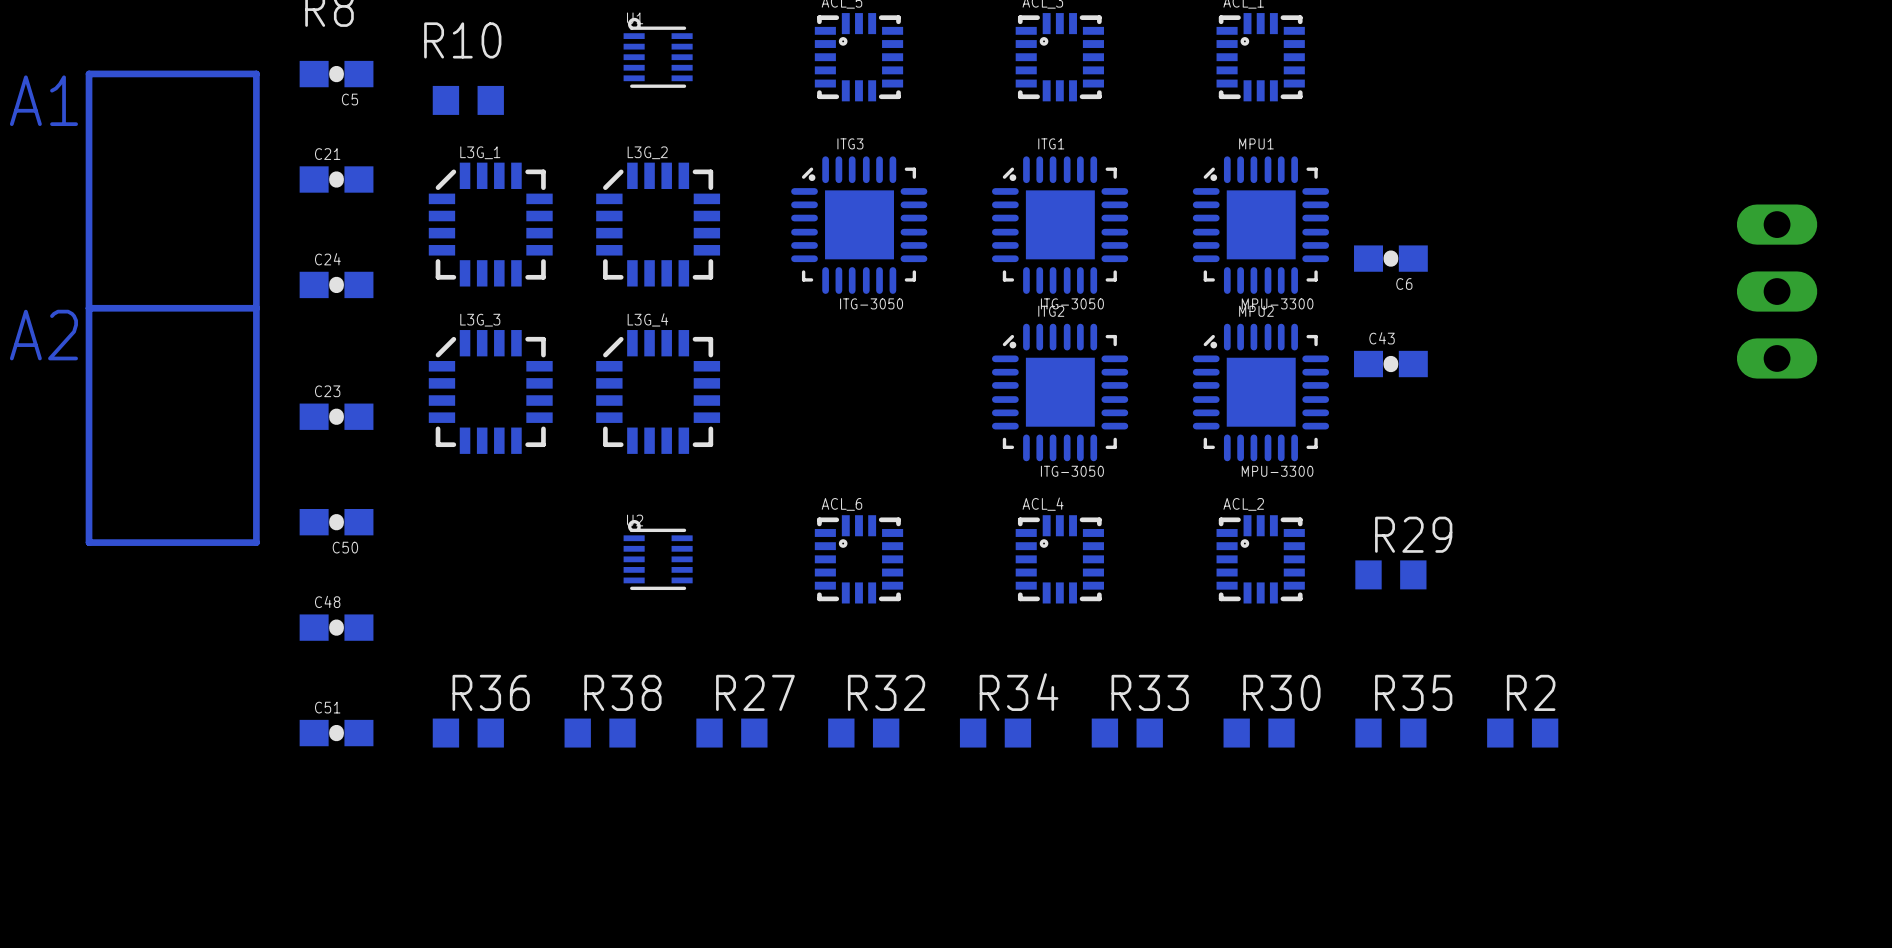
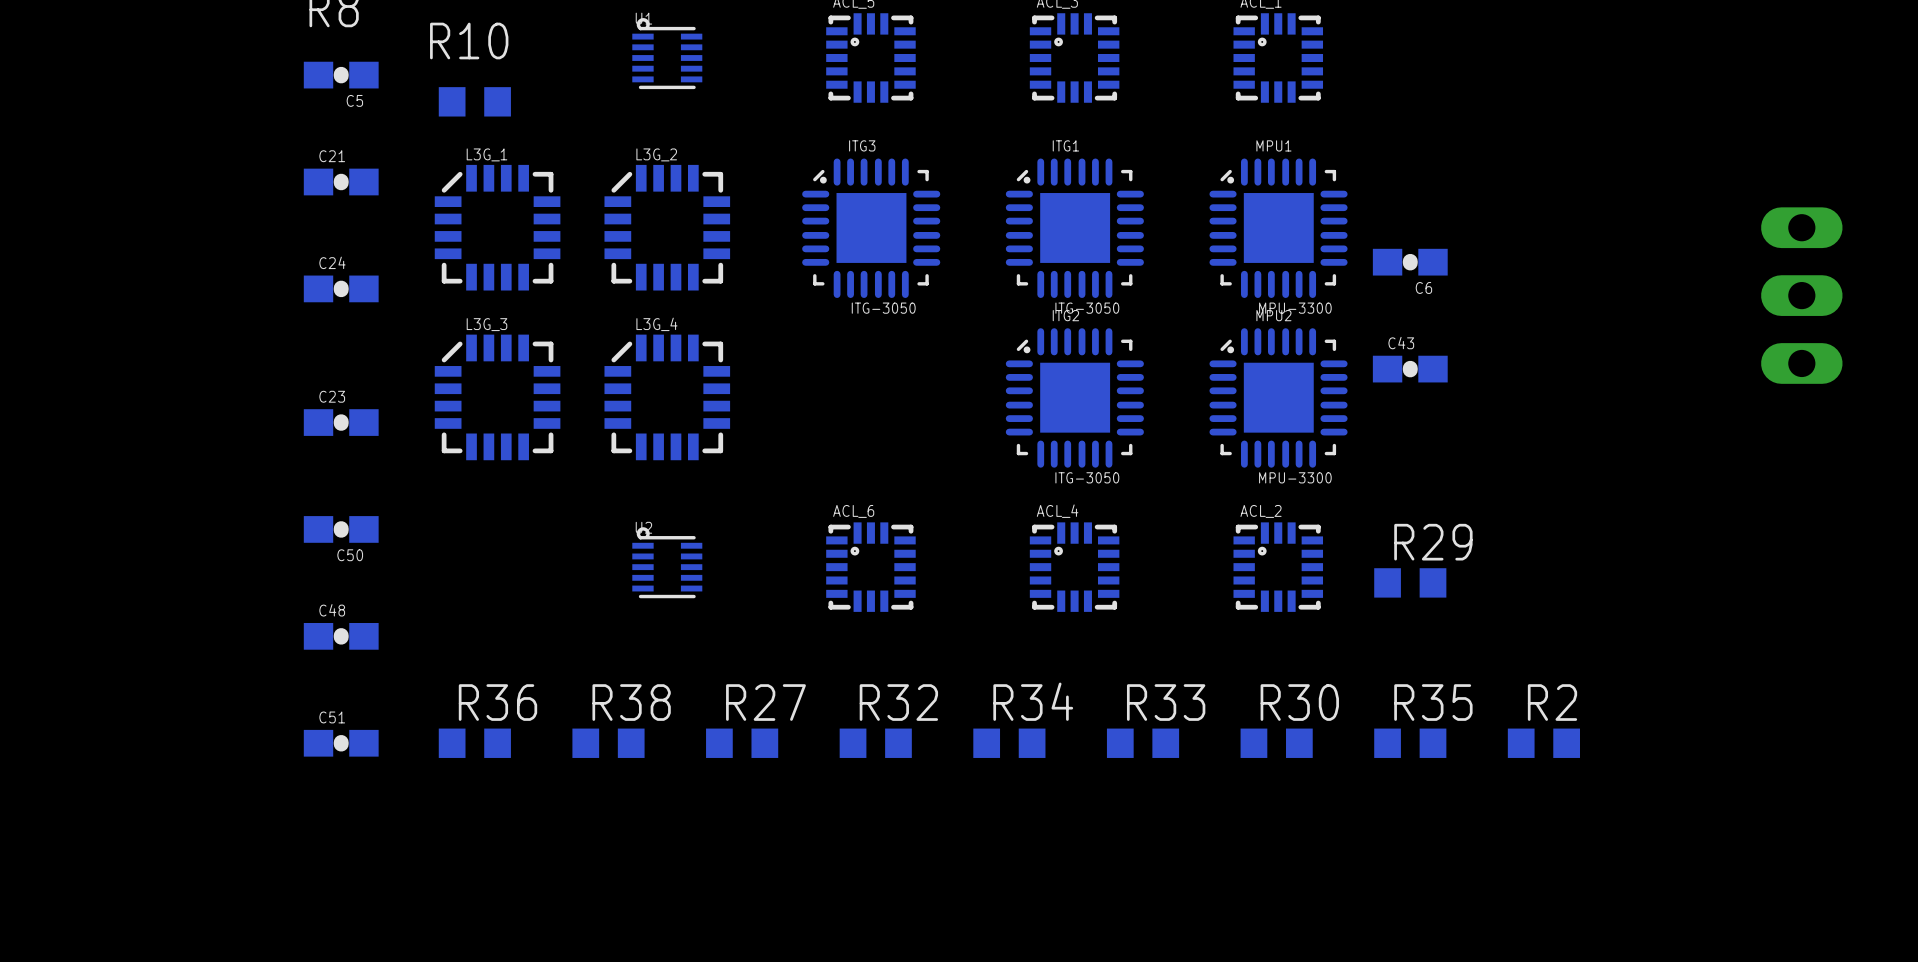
track: (256, 73) (89, 73) (89, 542) (256, 542) (256, 73) -> none
text: A1 (43, 100) -> none
track: (256, 308) (89, 308) -> none
text: A2 (43, 335) -> none

